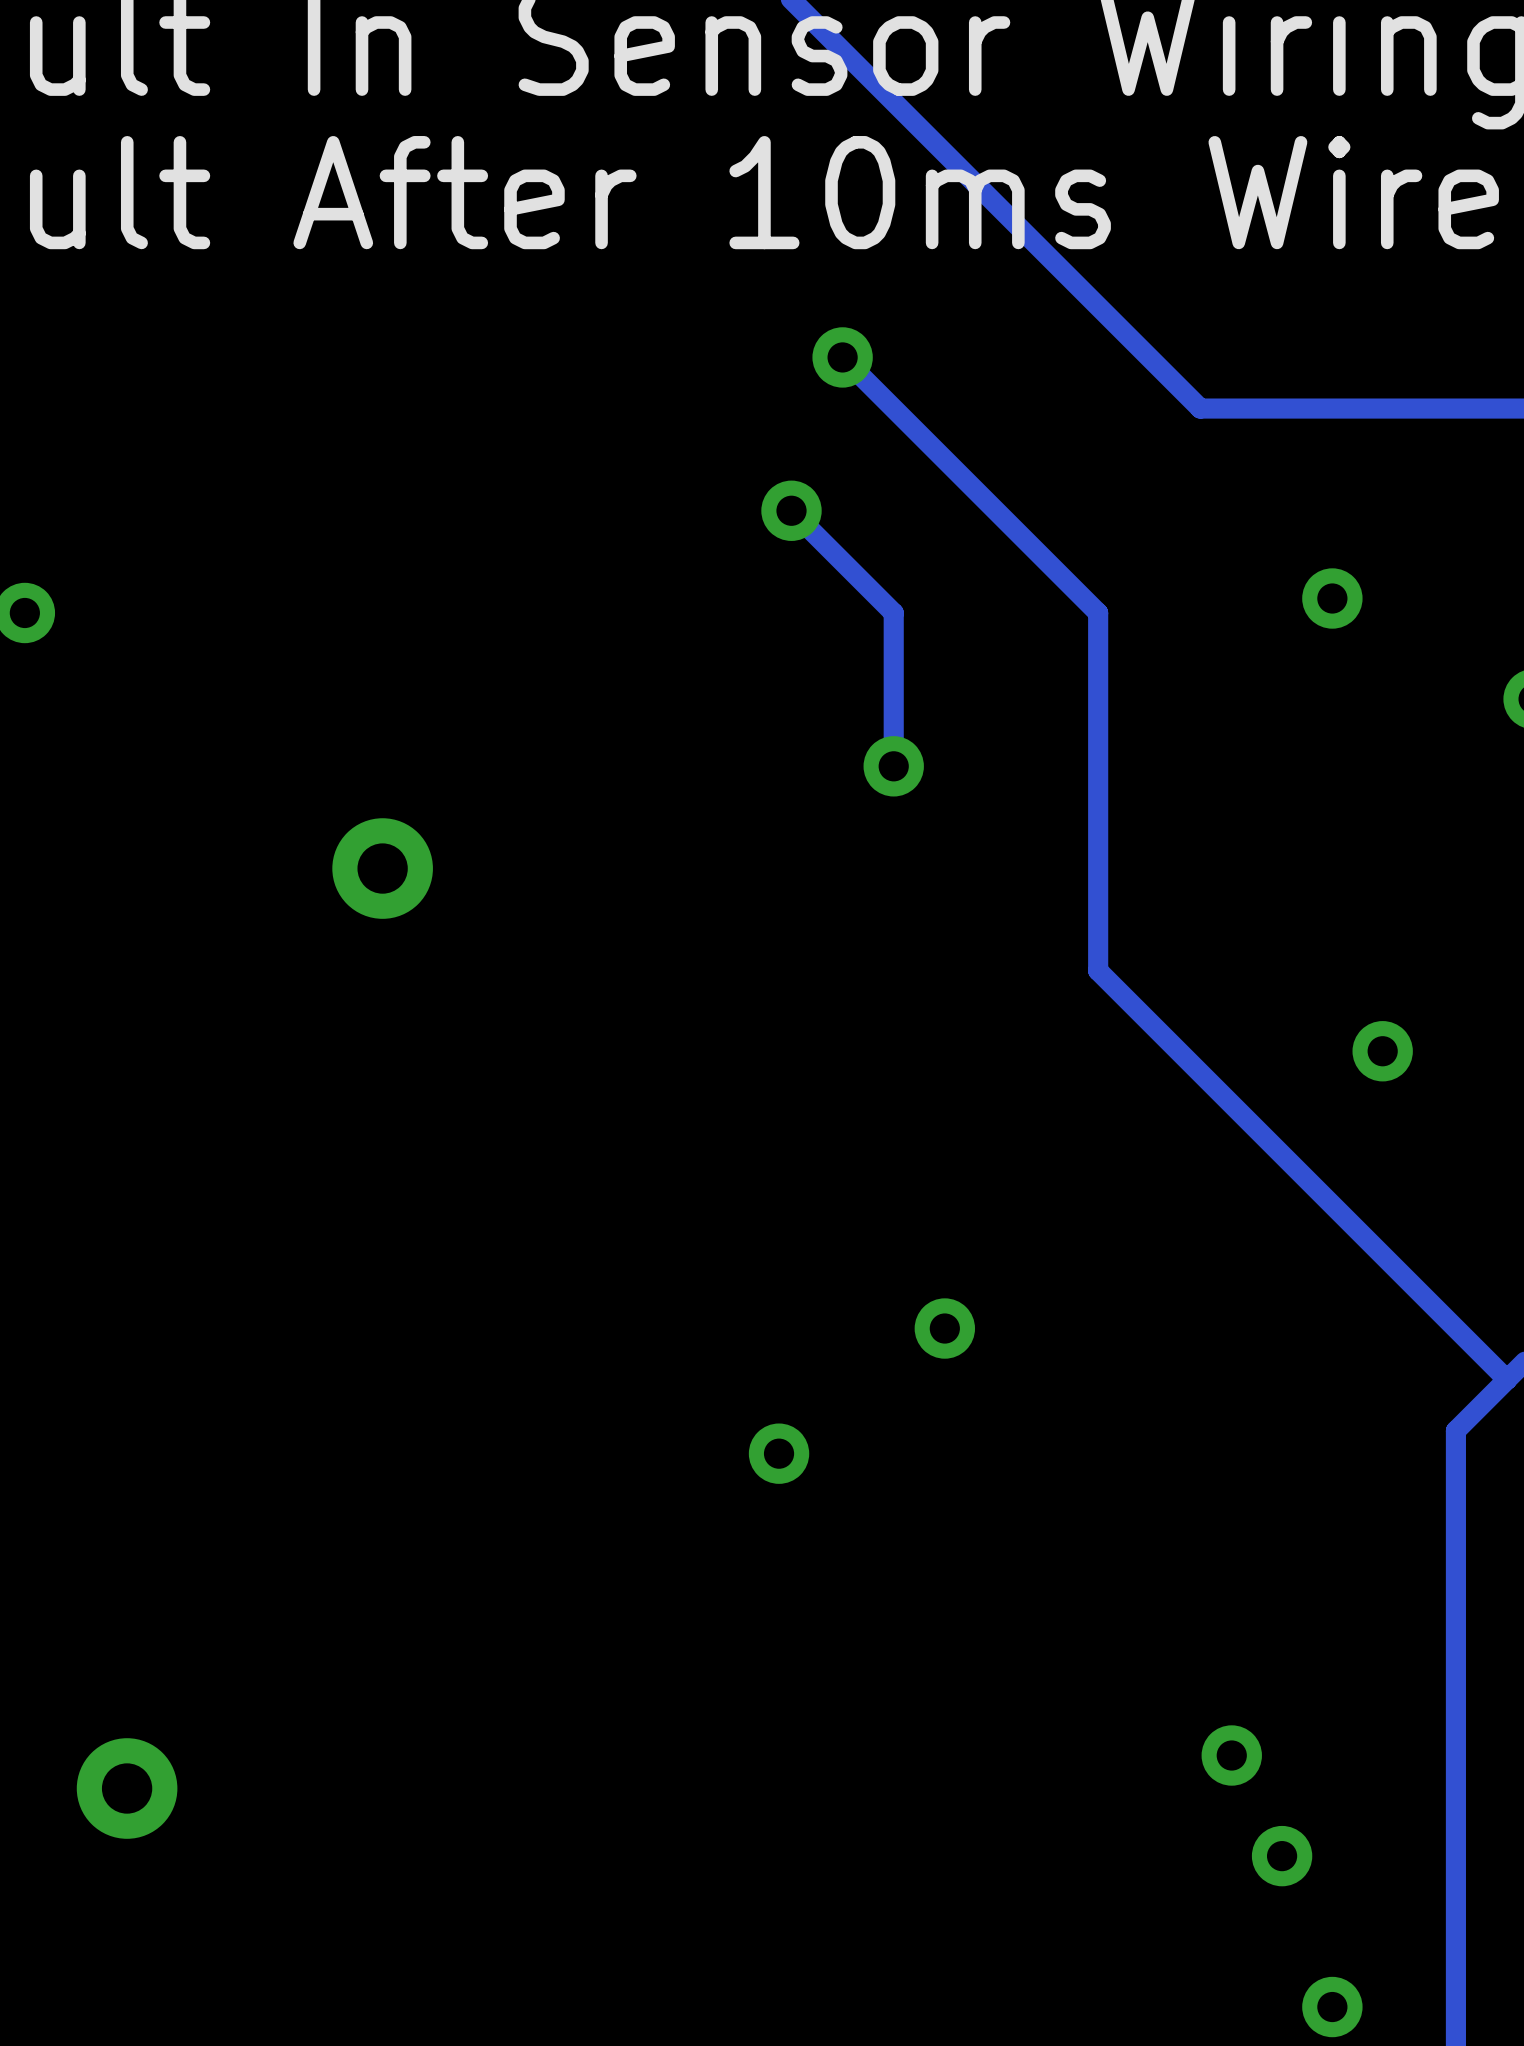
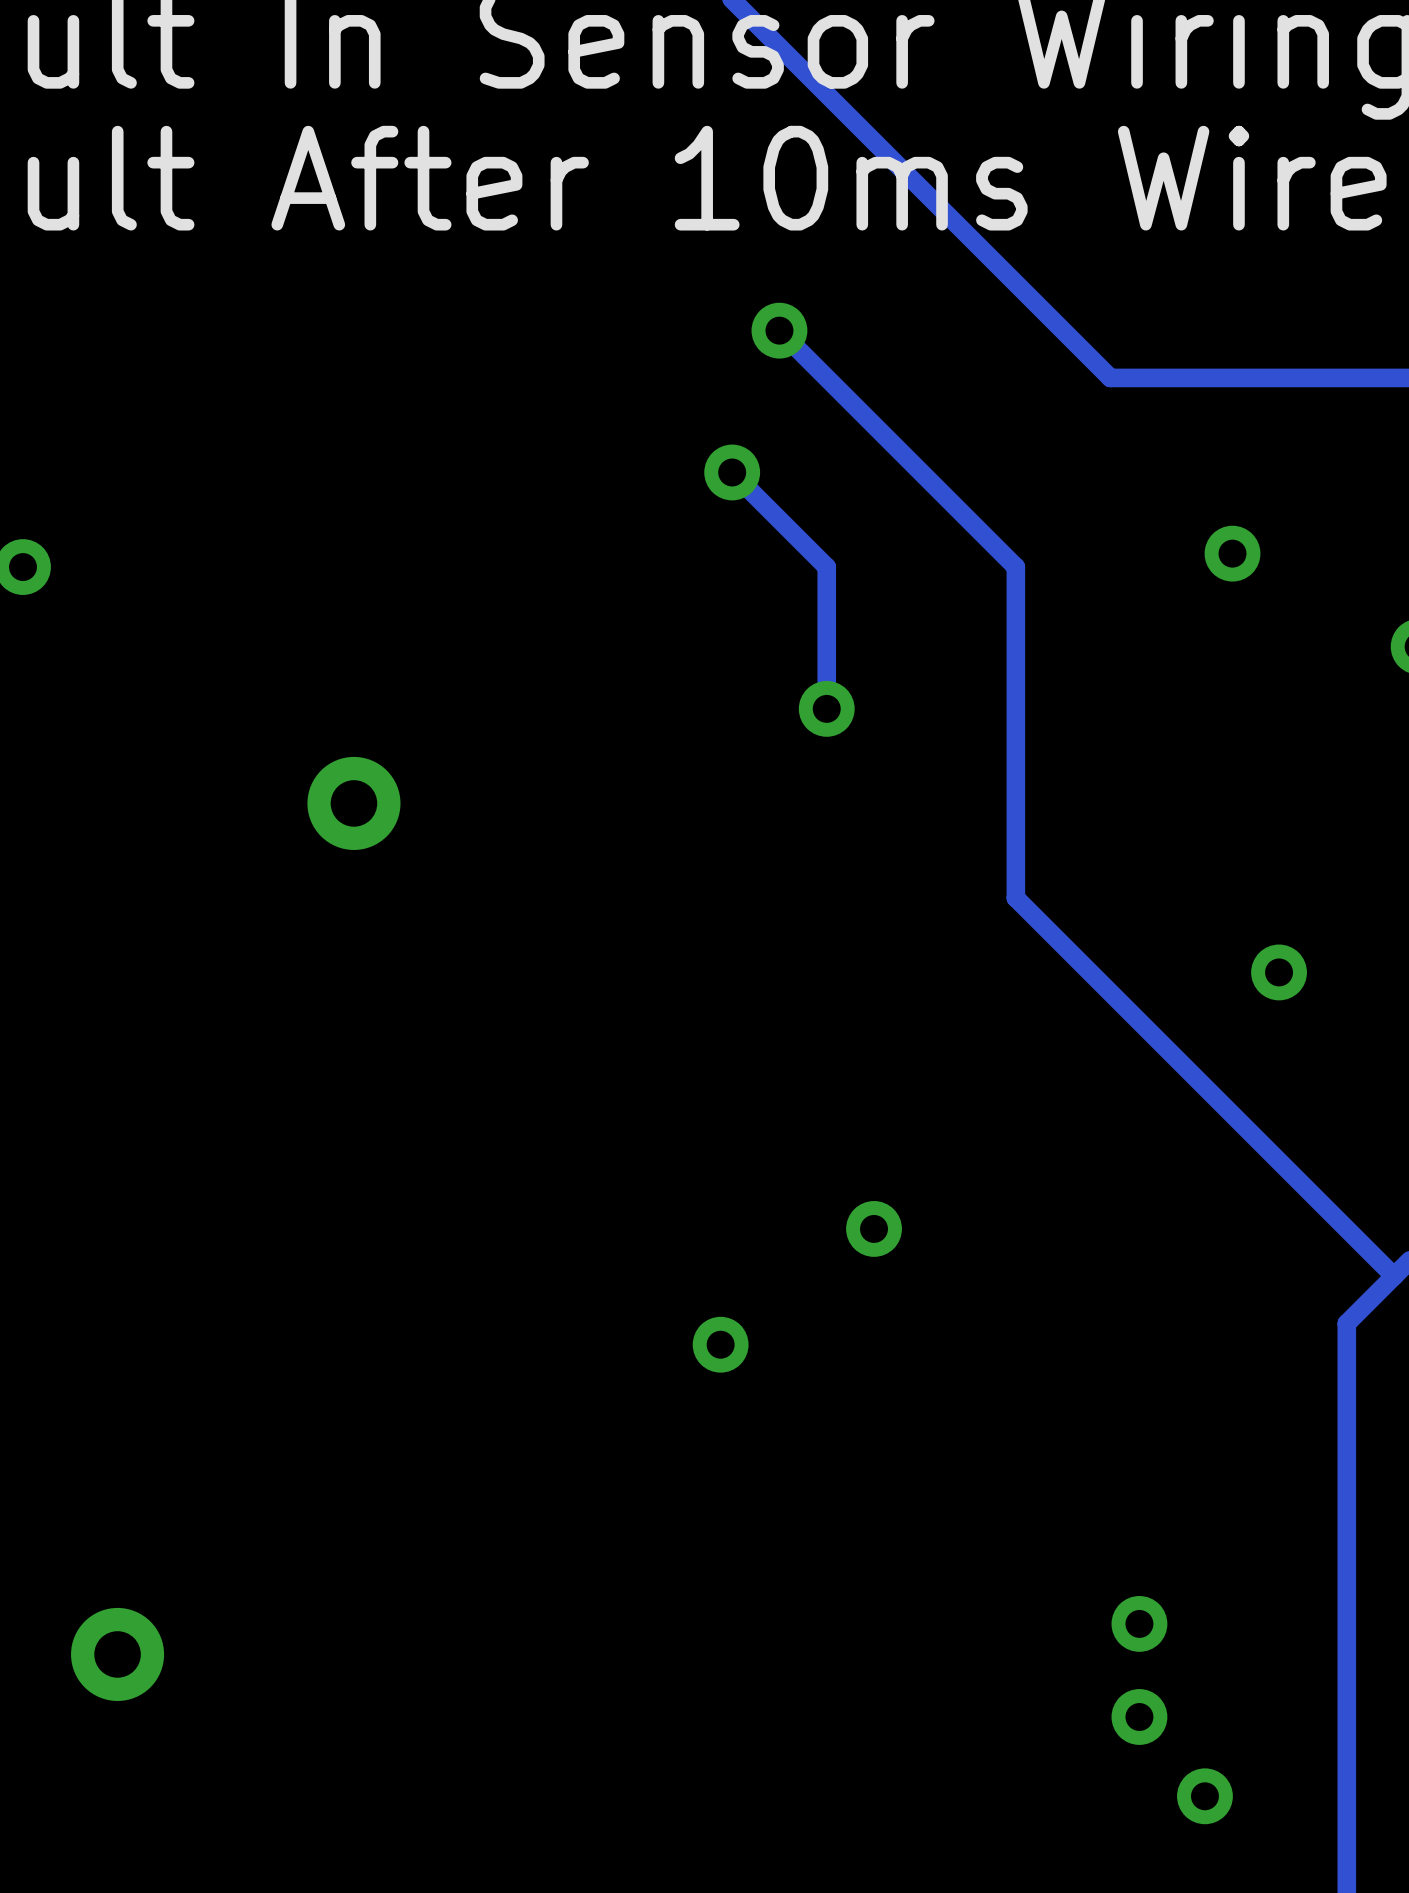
via position: (1282, 1856) -> (1139, 1716)
via: none -> (1204, 1796)
via: (1332, 2007) -> none

